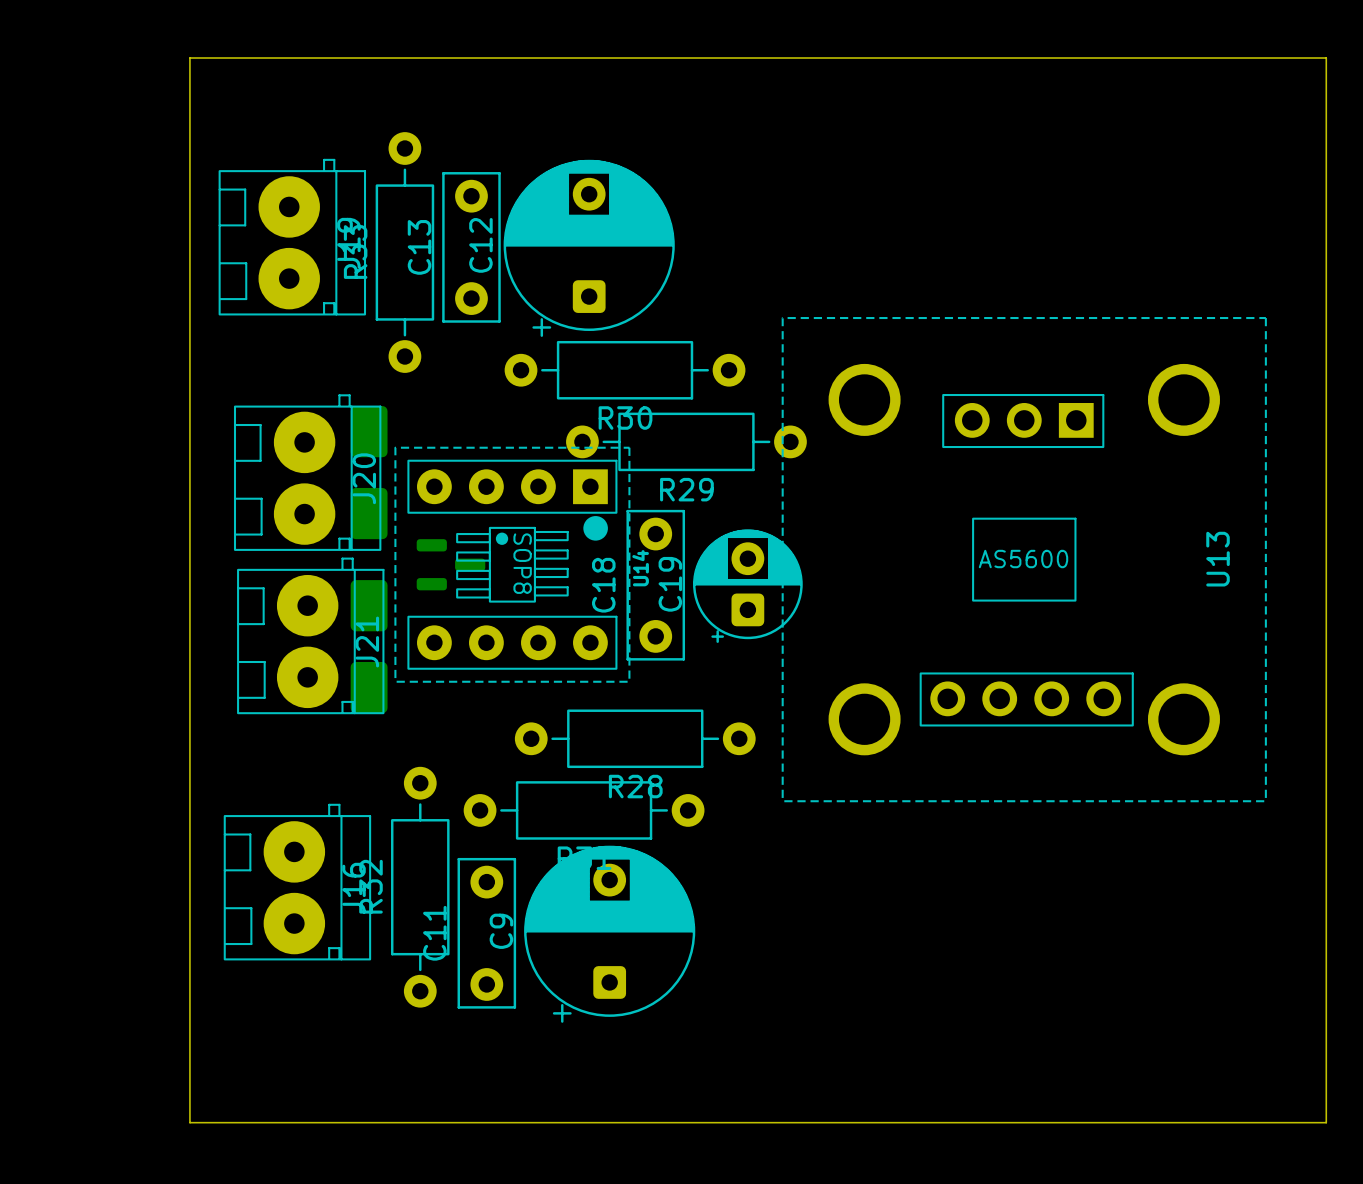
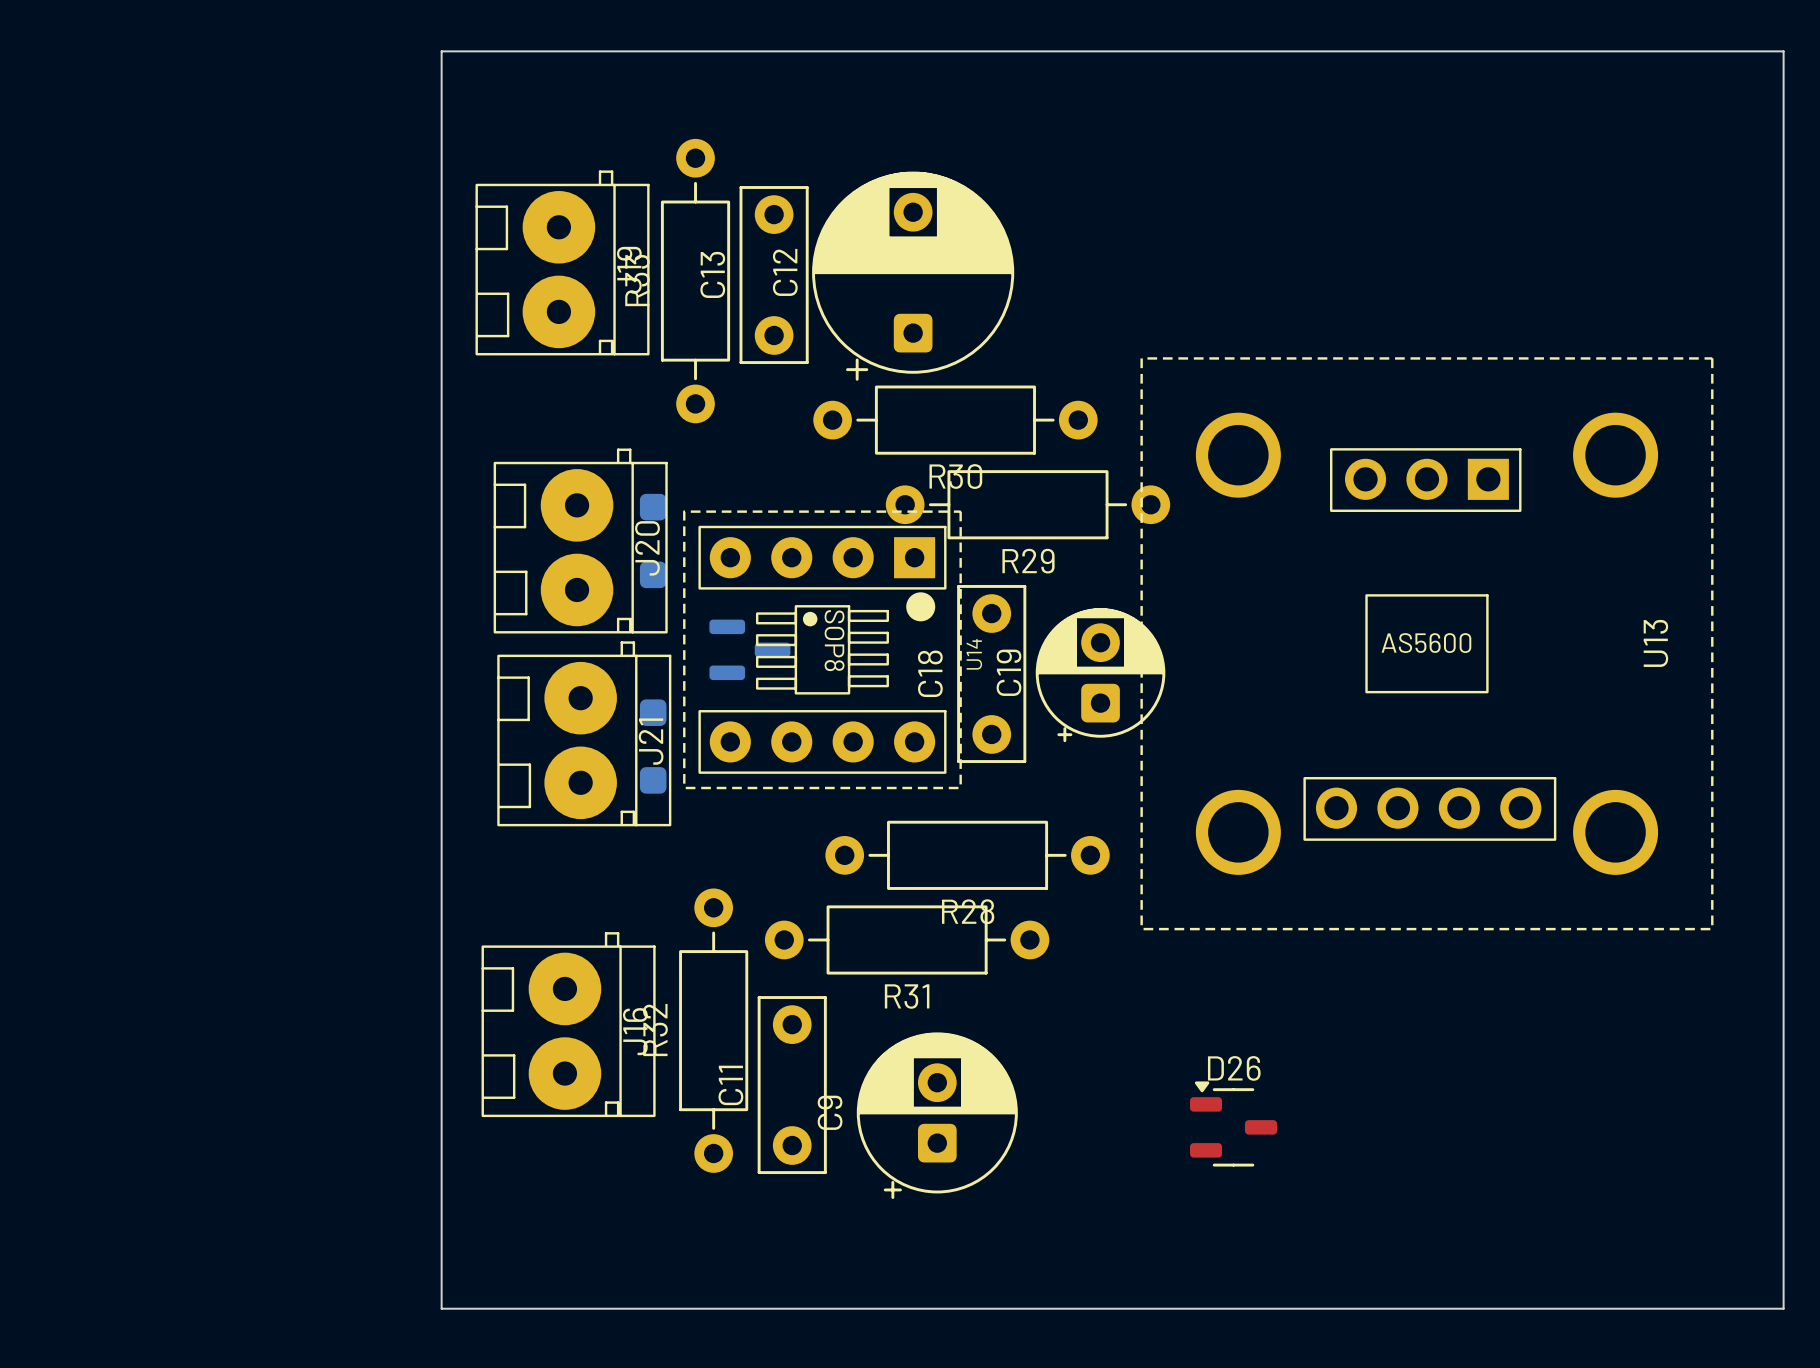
part footprint: [350, 406, 388, 540] -> [639, 493, 667, 589]
part footprint: [350, 580, 388, 714] -> [639, 699, 667, 794]
C9 footprint: [524, 845, 696, 1023] -> [856, 1032, 1018, 1200]
D26: none -> (1233, 1123)

